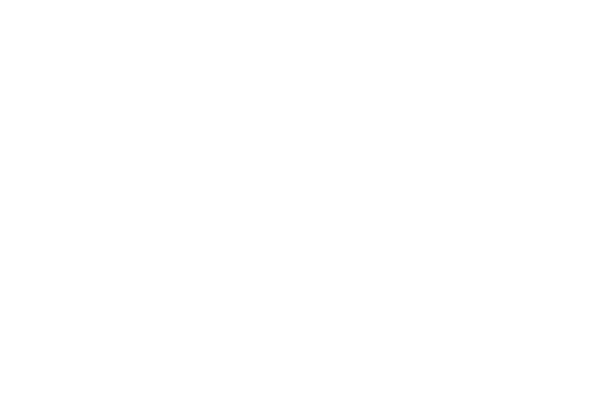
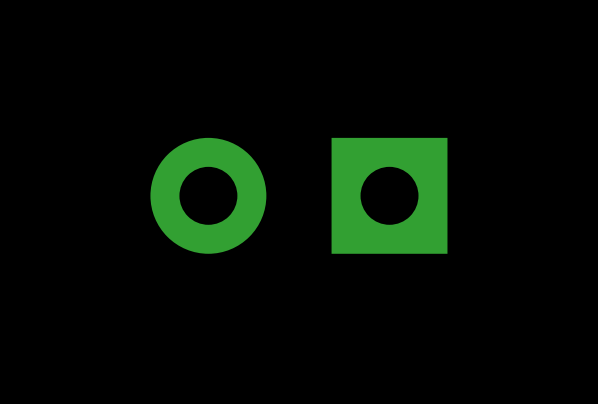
part: none -> (298, 195)

